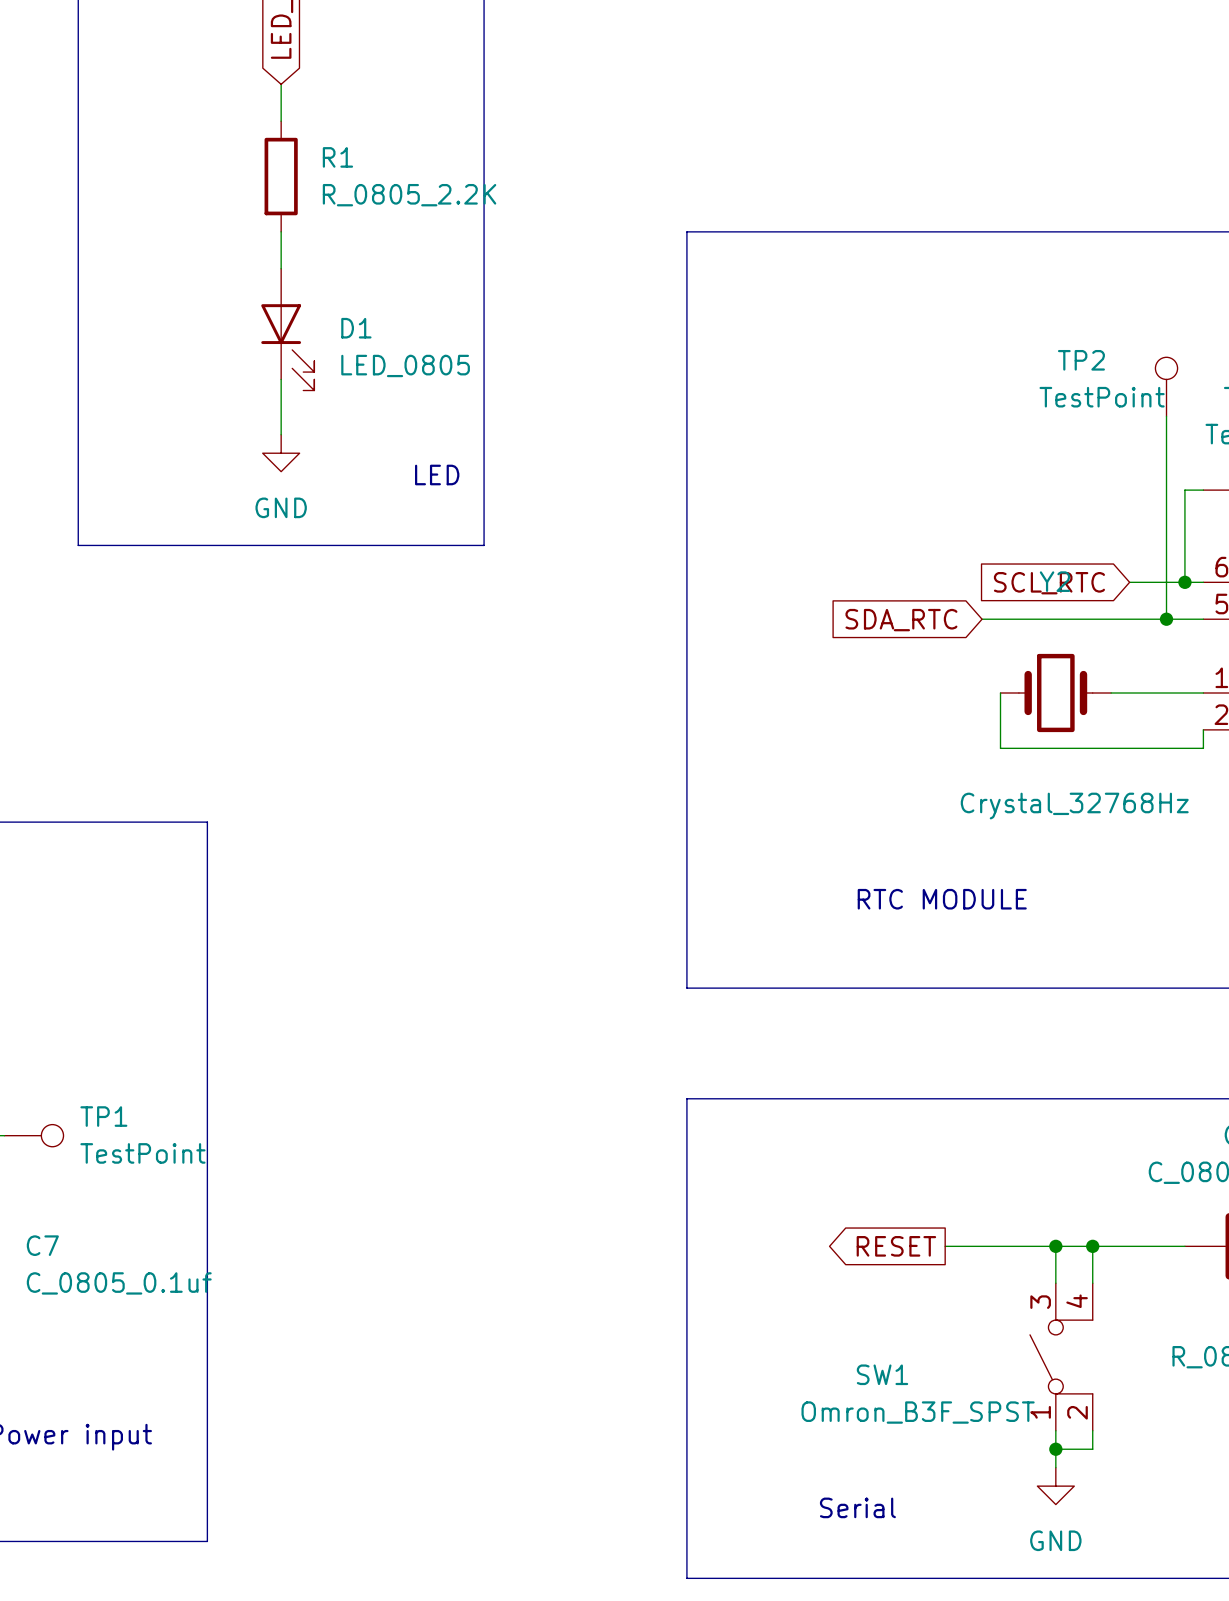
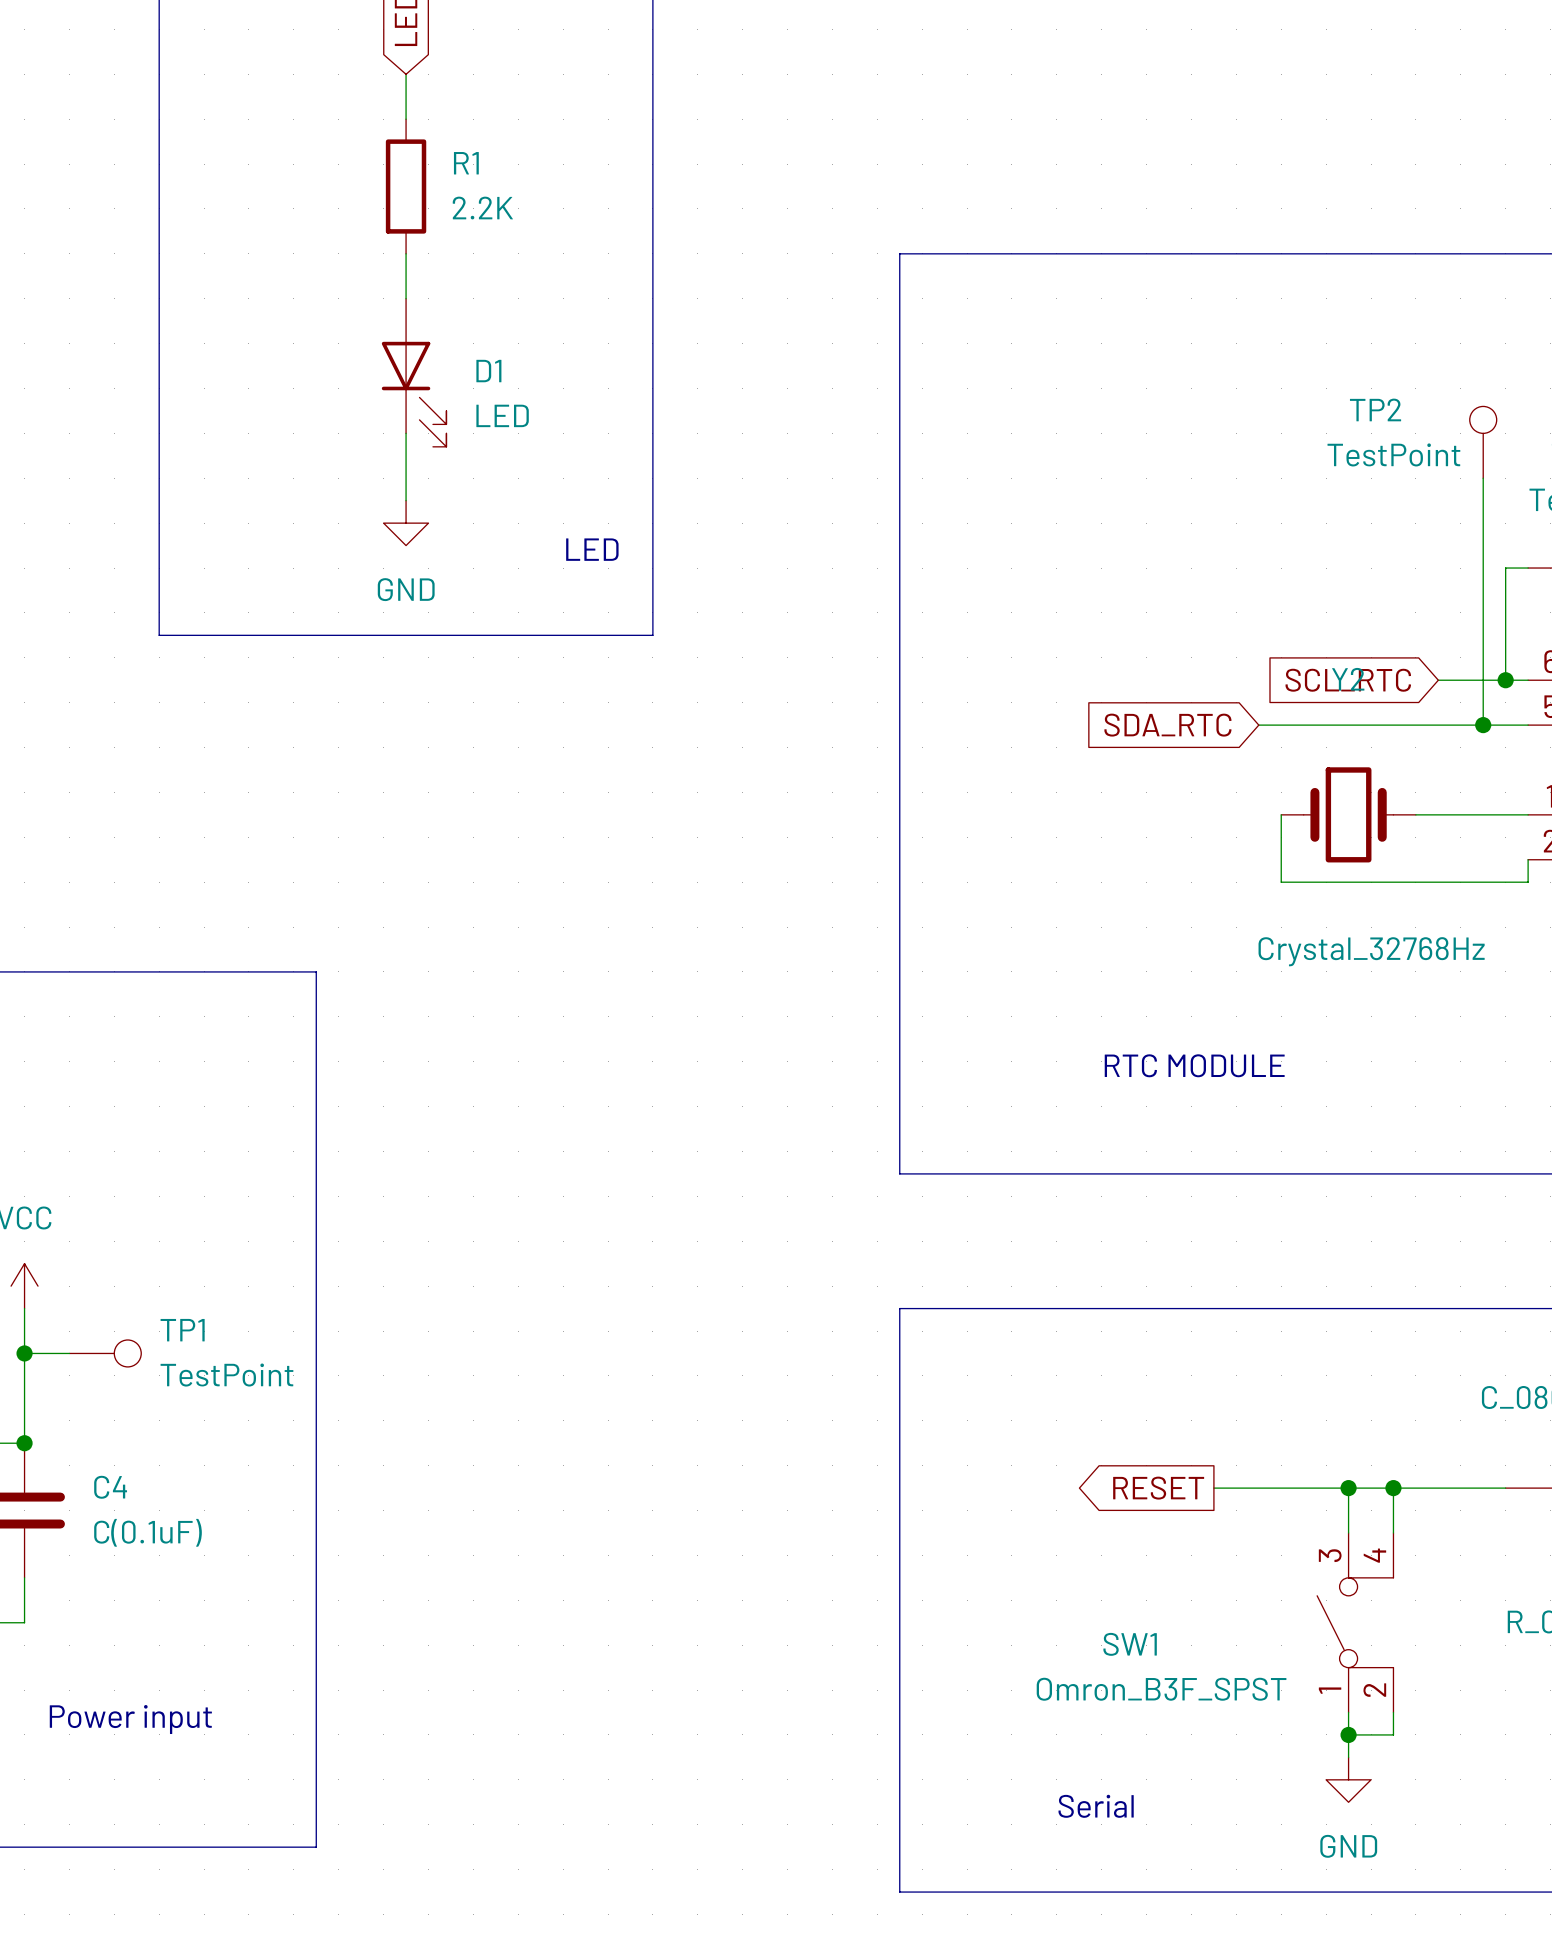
R1 value: R_0805_2.2K (409, 195) -> 2.2K (482, 208)
D1 value: LED_0805 (405, 365) -> LED (502, 415)
C7 name: C7 (42, 1245) -> C4 (110, 1487)
C7 value: C_0805_0.1uf (119, 1283) -> C(0.1uF) (148, 1532)

